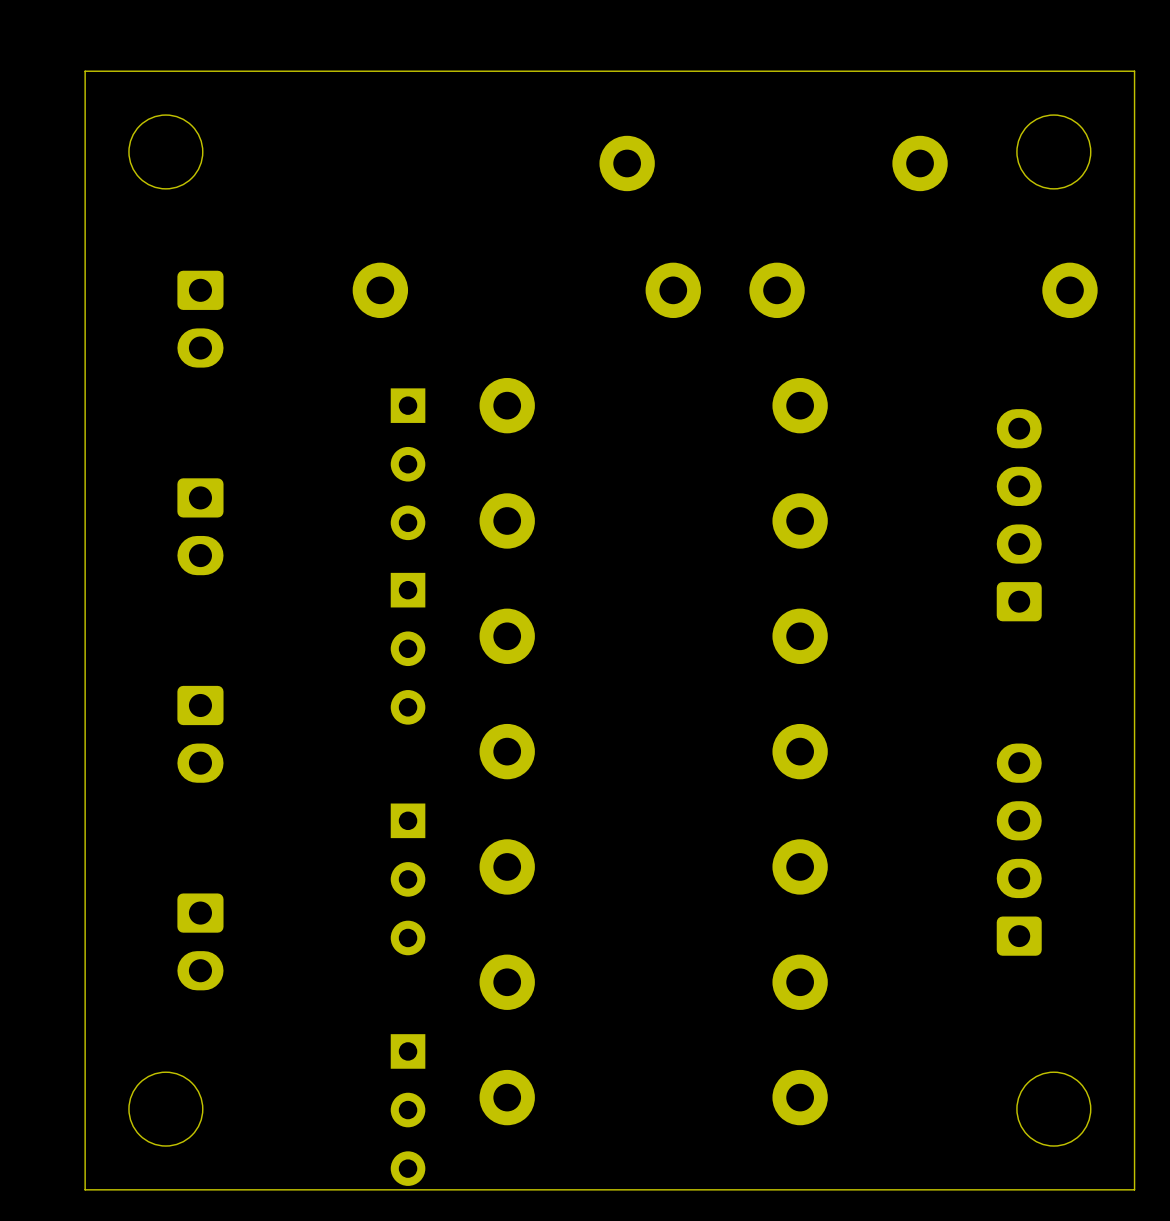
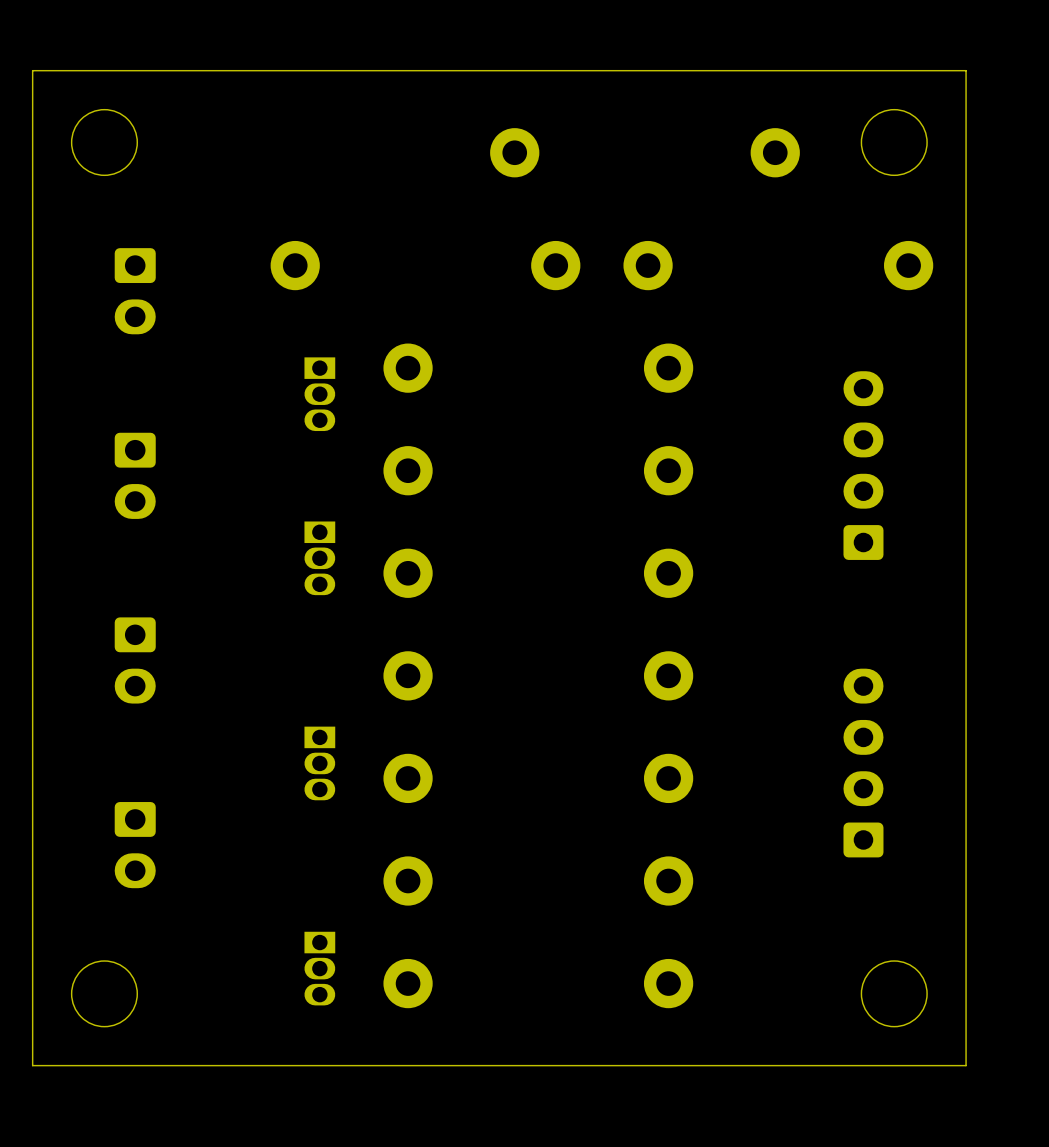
part: none -> (319, 394)
part: (408, 464) -> none
part: none -> (319, 558)
part: (408, 648) -> none
part: none -> (319, 763)
part: (408, 879) -> none
part: none -> (319, 968)
part: (408, 1110) -> none

